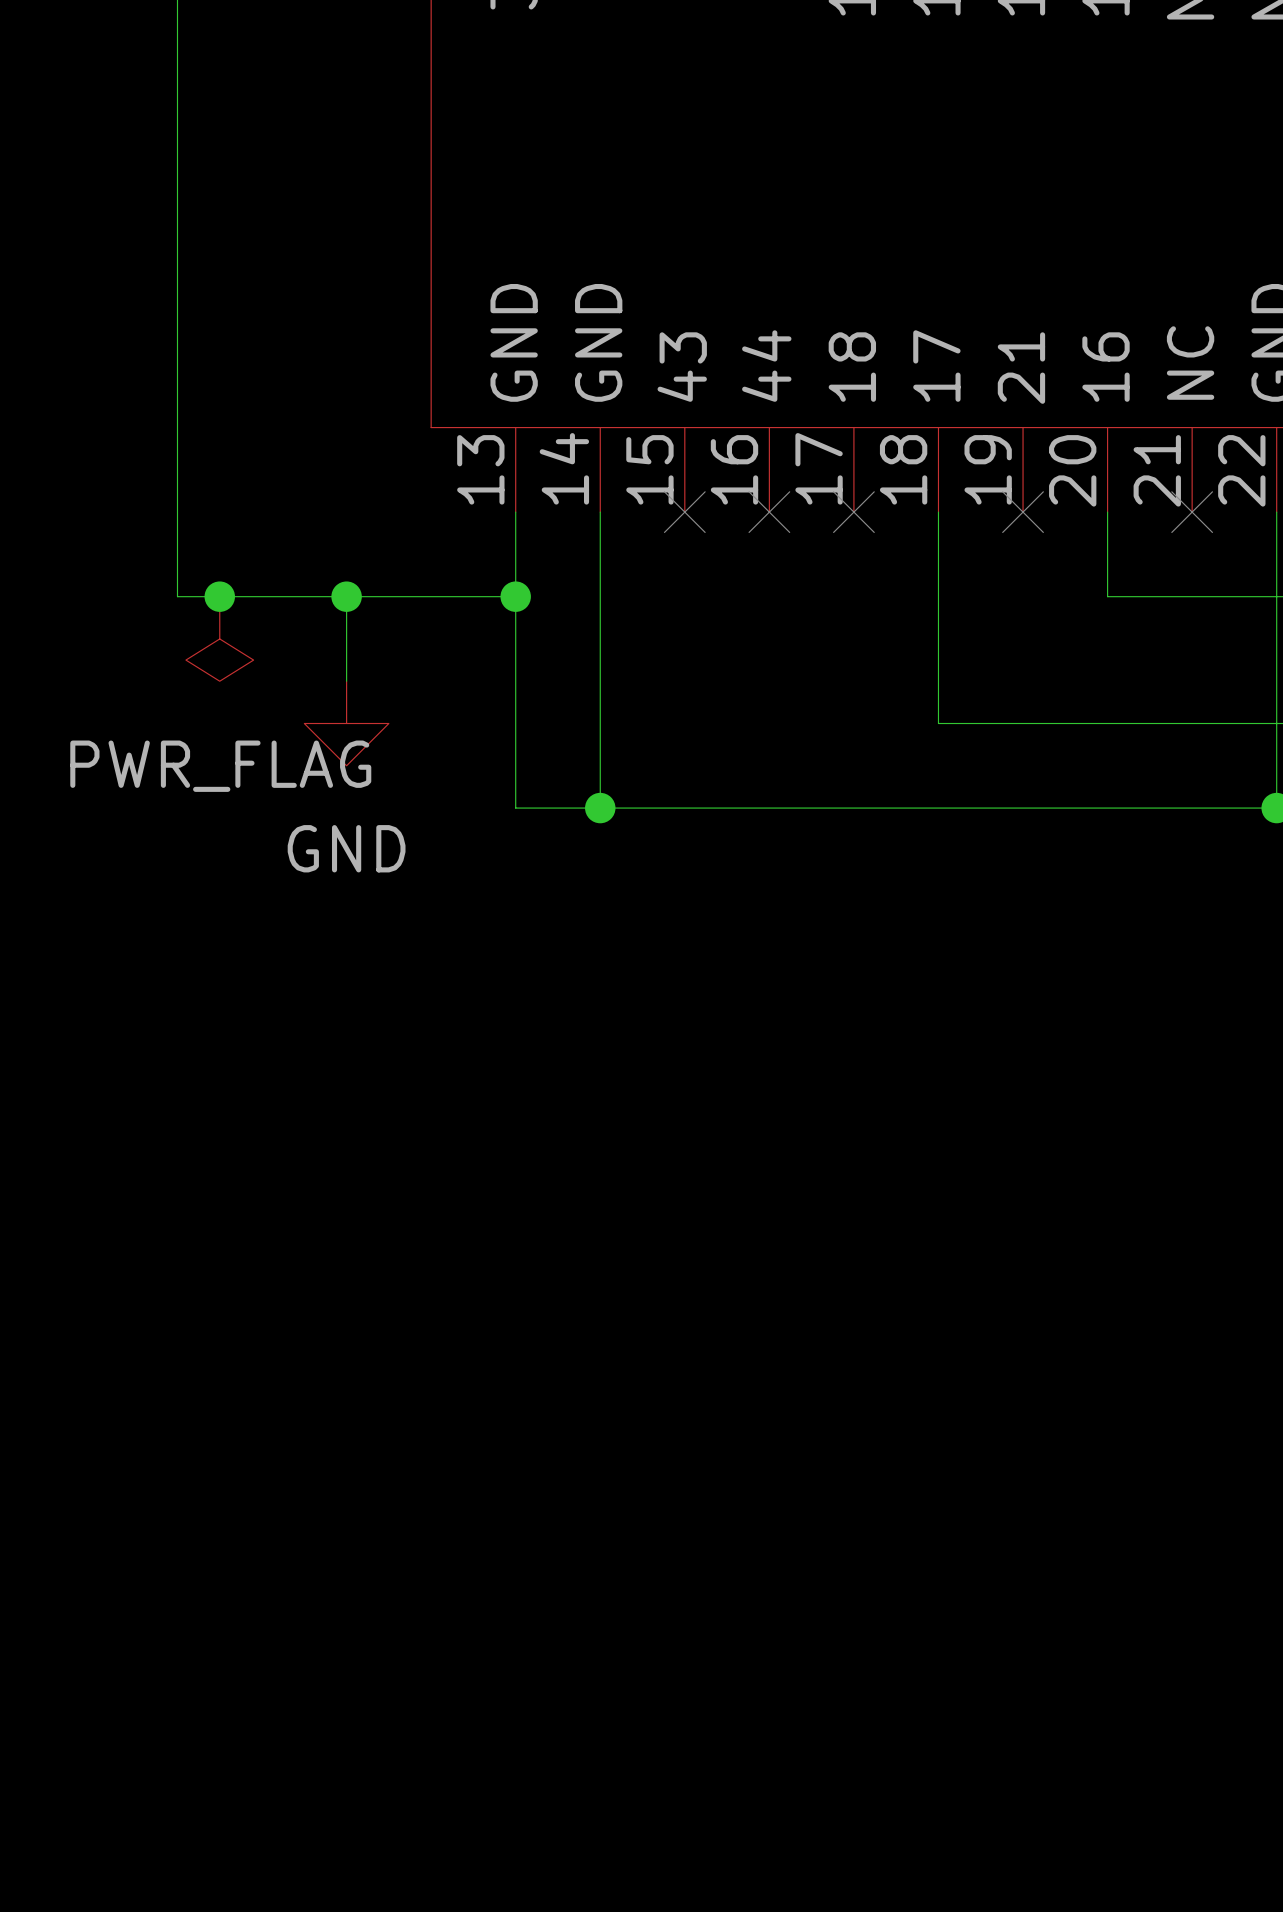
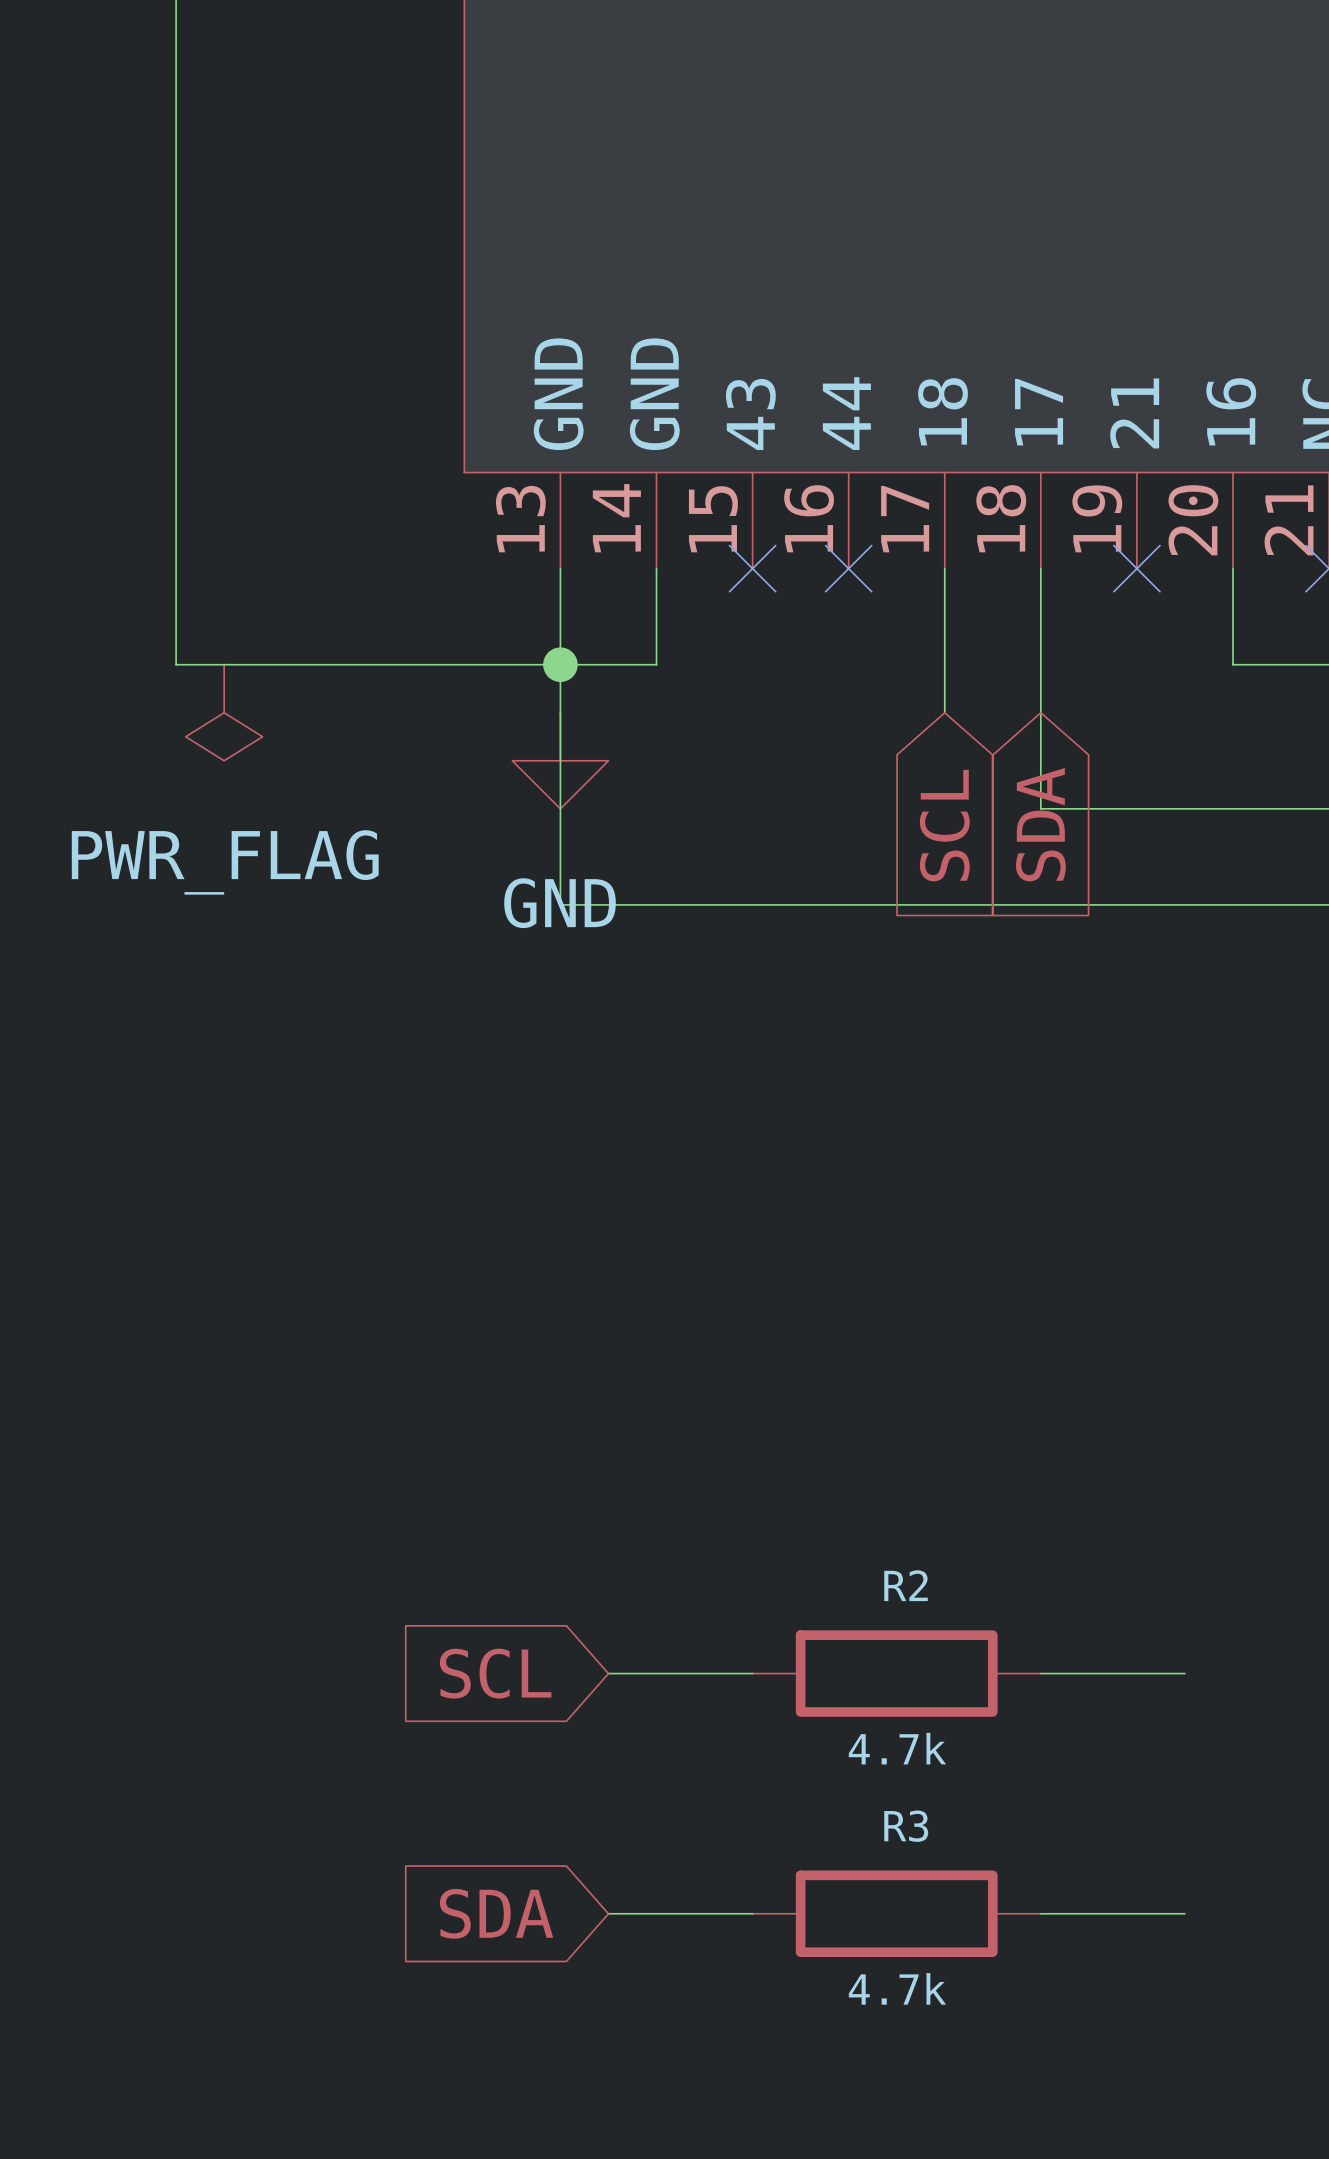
wire: none -> (944, 568) (944, 712)
no-connect mark: (853, 512) -> none
junction: (219, 596) -> none
wire: (346, 596) (346, 681) -> none
junction: (346, 596) -> none
wire: (600, 596) (600, 808) -> (656, 664) (560, 664)
power symbol position: GND (346, 723) -> GND (560, 760)
global label: none -> SCL (944, 825)
global label: none -> SDA (1040, 824)
junction: (600, 808) -> none
global label: none -> SCL (495, 1673)
wire: none -> (608, 1673) (752, 1673)
R2: none -> 4.7k (896, 1673)
wire: none -> (1040, 1673) (1184, 1673)
global label: none -> SDA (496, 1913)
wire: none -> (608, 1913) (752, 1913)
R3: none -> 4.7k (896, 1913)
wire: none -> (1040, 1913) (1184, 1913)

